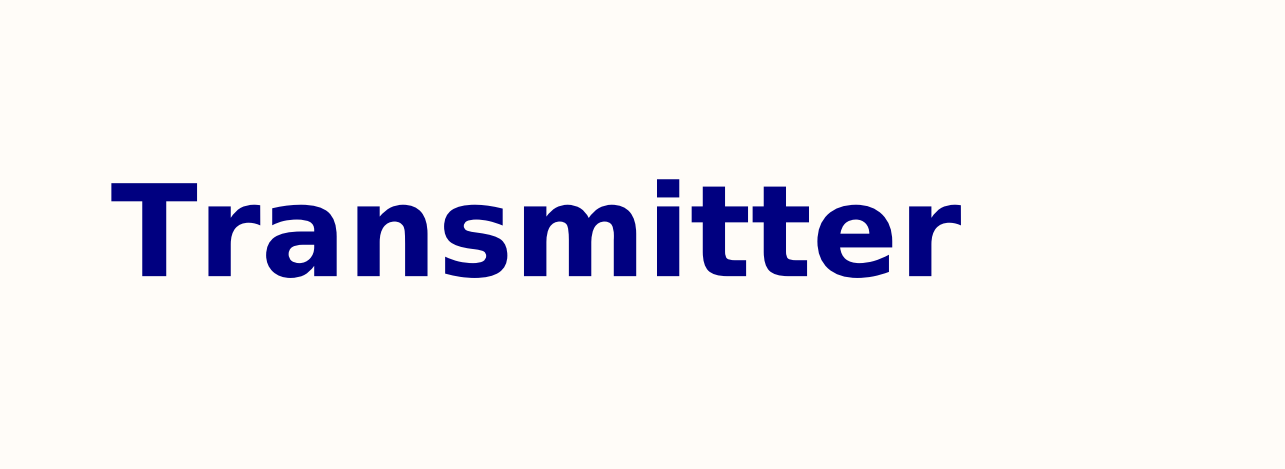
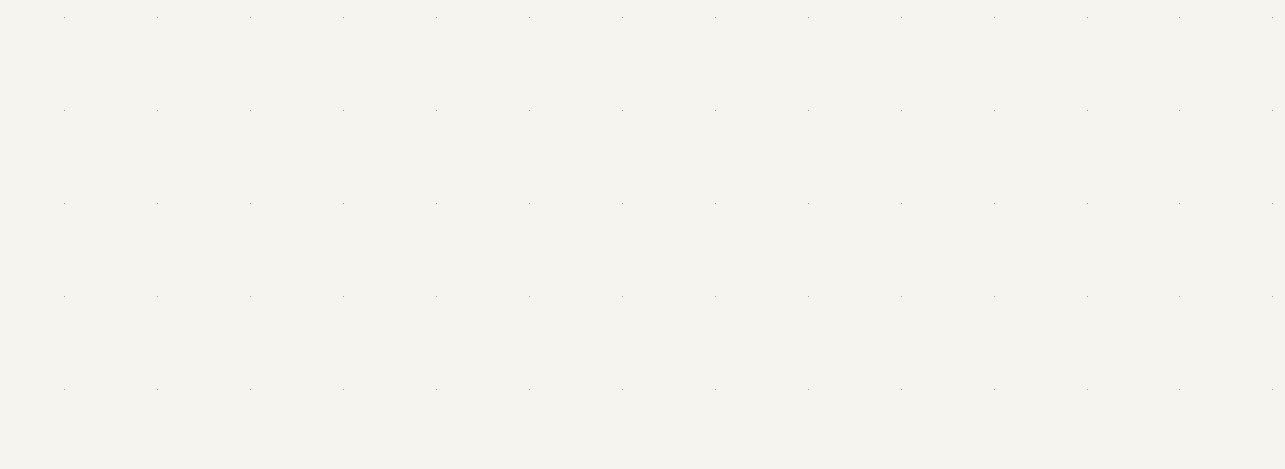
text: Transmitter (536, 228) -> none

